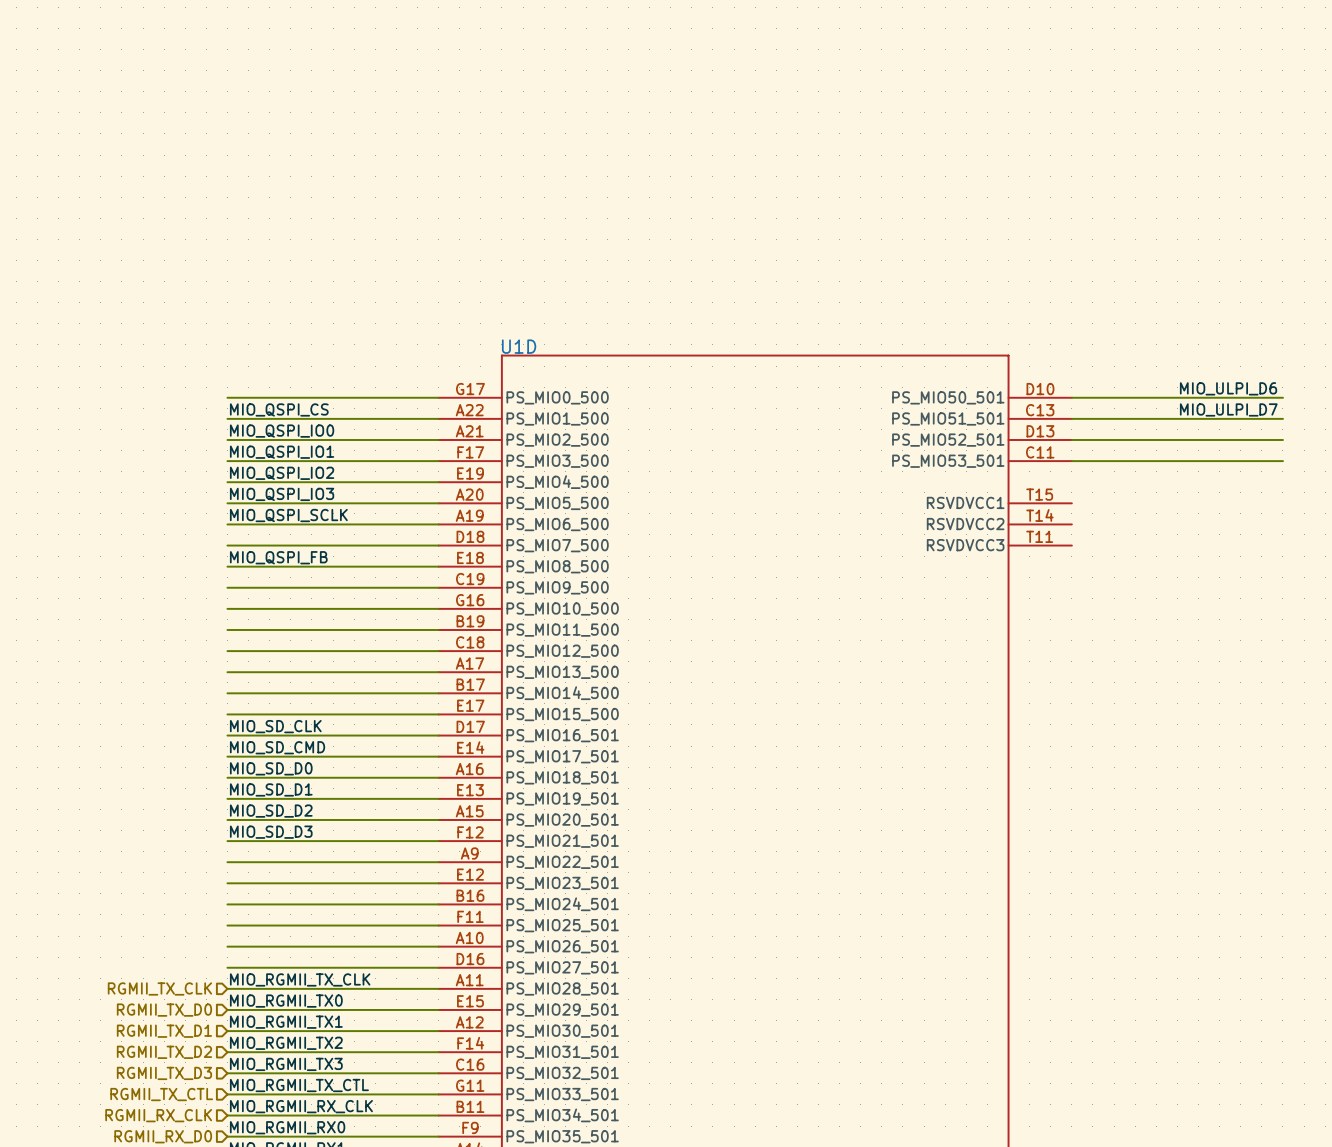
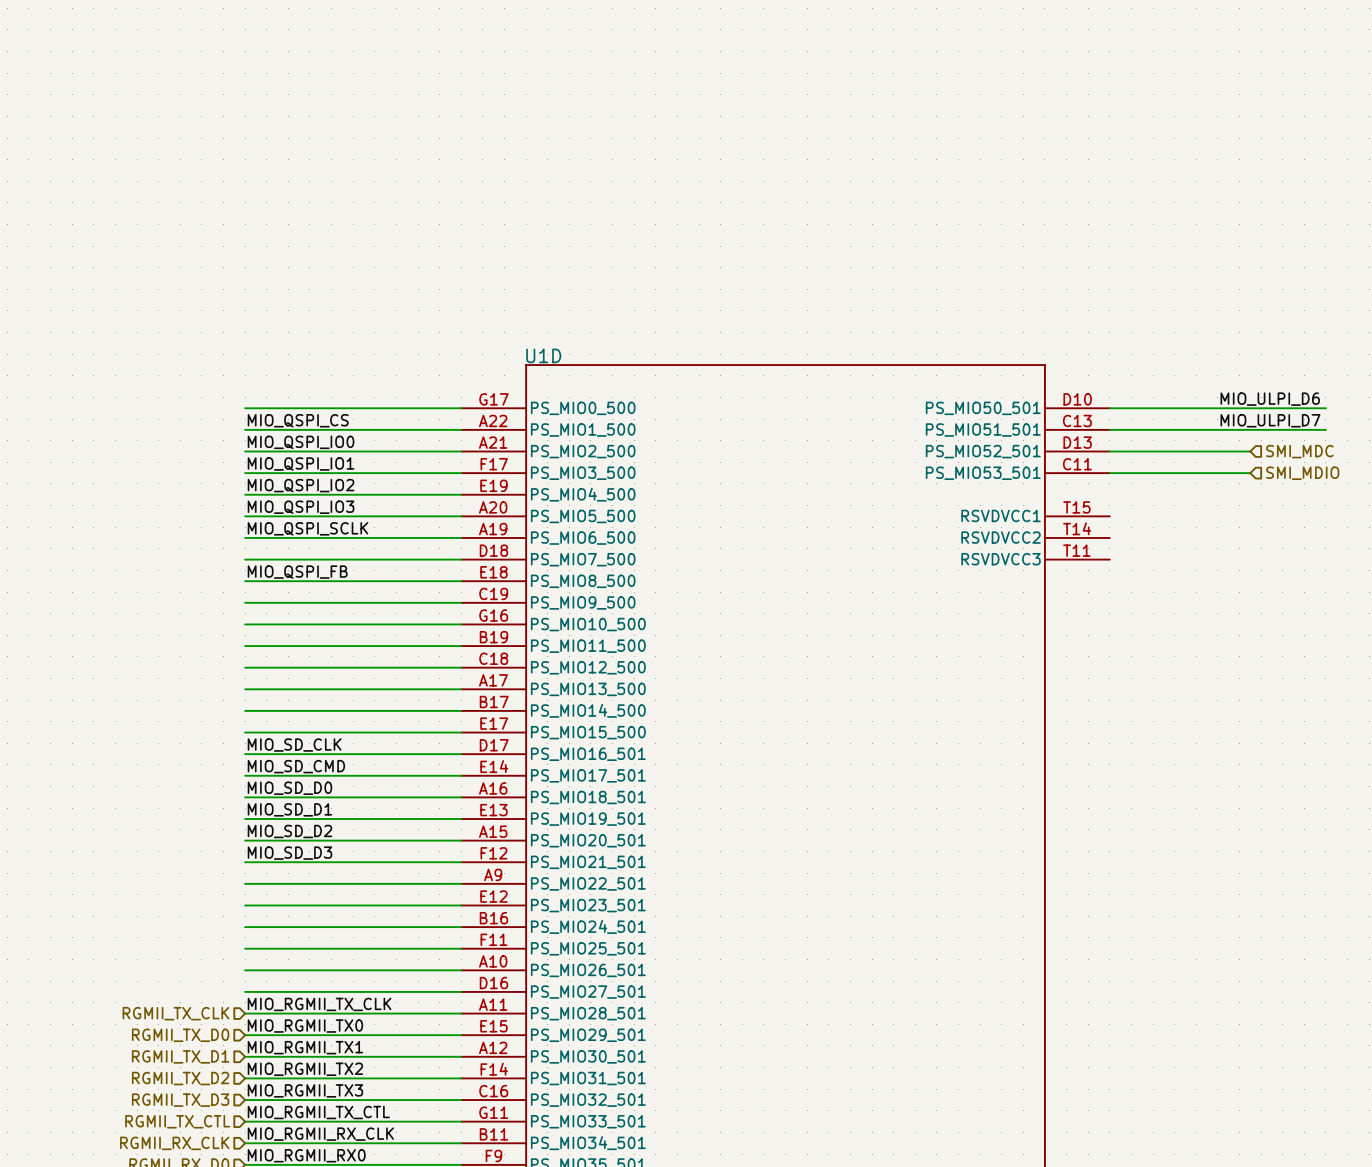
wire: (1209, 439) (1282, 439) -> none
hierarchical label: none -> SMI_MDC (1299, 451)
wire: (1209, 461) (1282, 461) -> none
hierarchical label: none -> SMI_MDIO (1302, 473)

